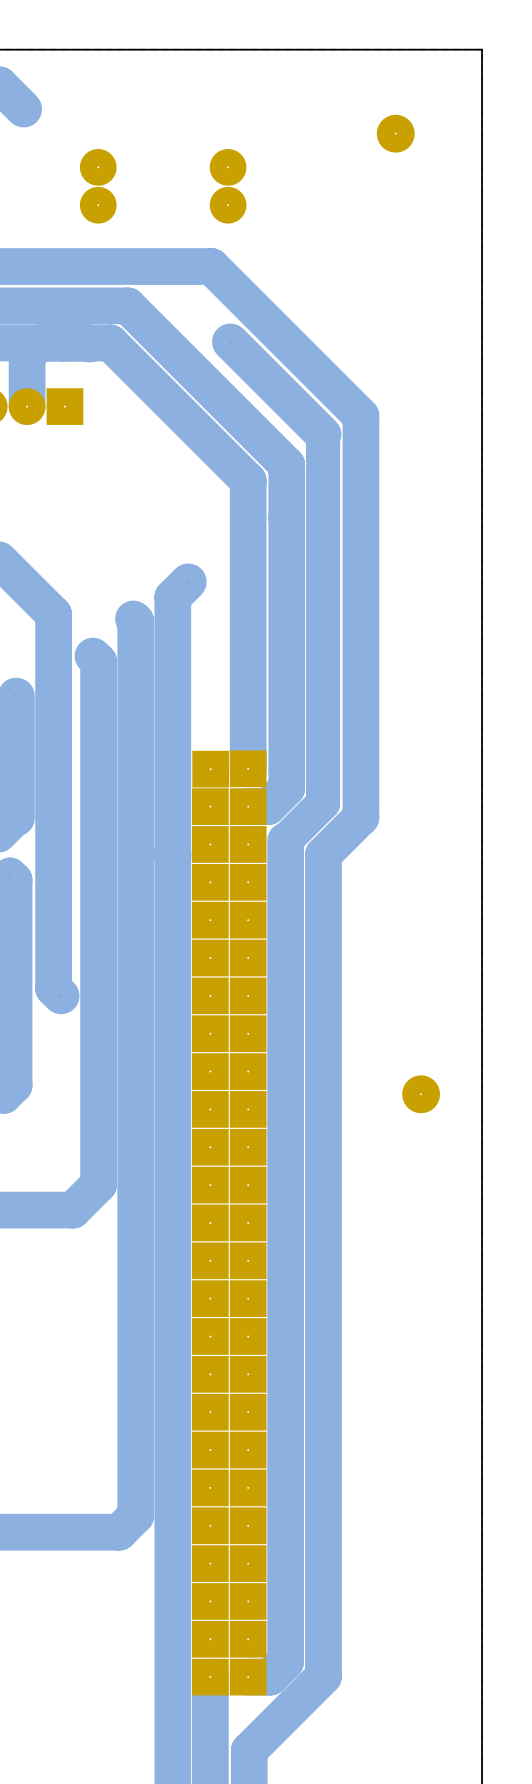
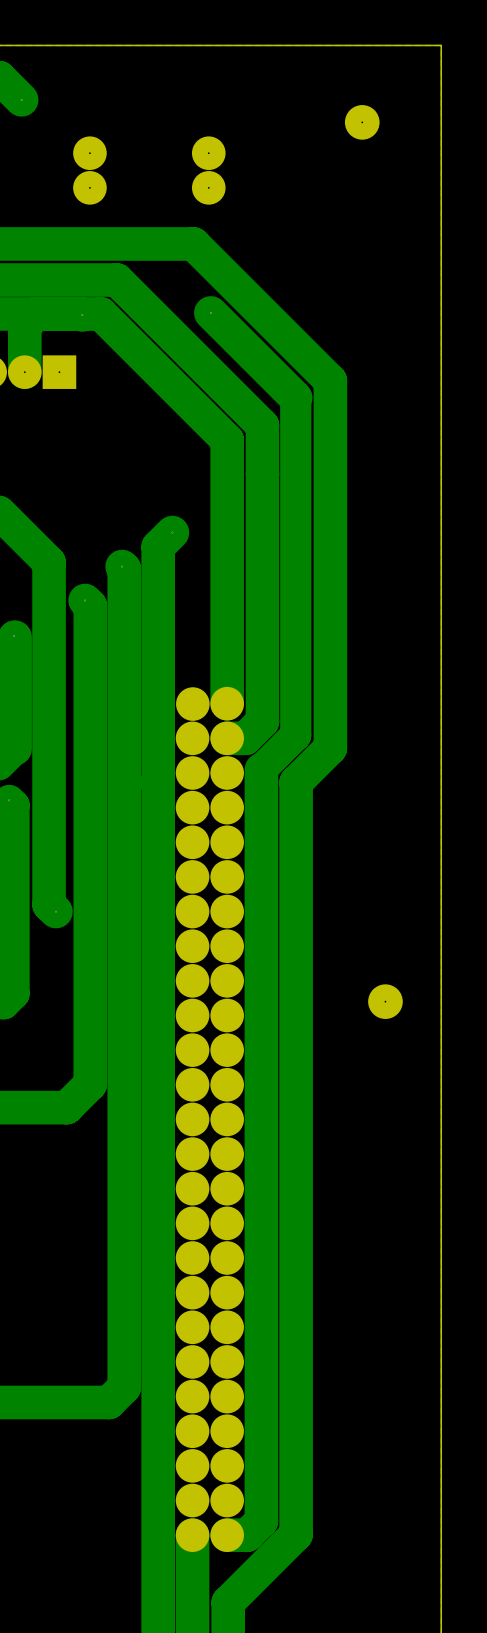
part footprint: [191, 750, 267, 1696] -> [175, 686, 244, 1552]

